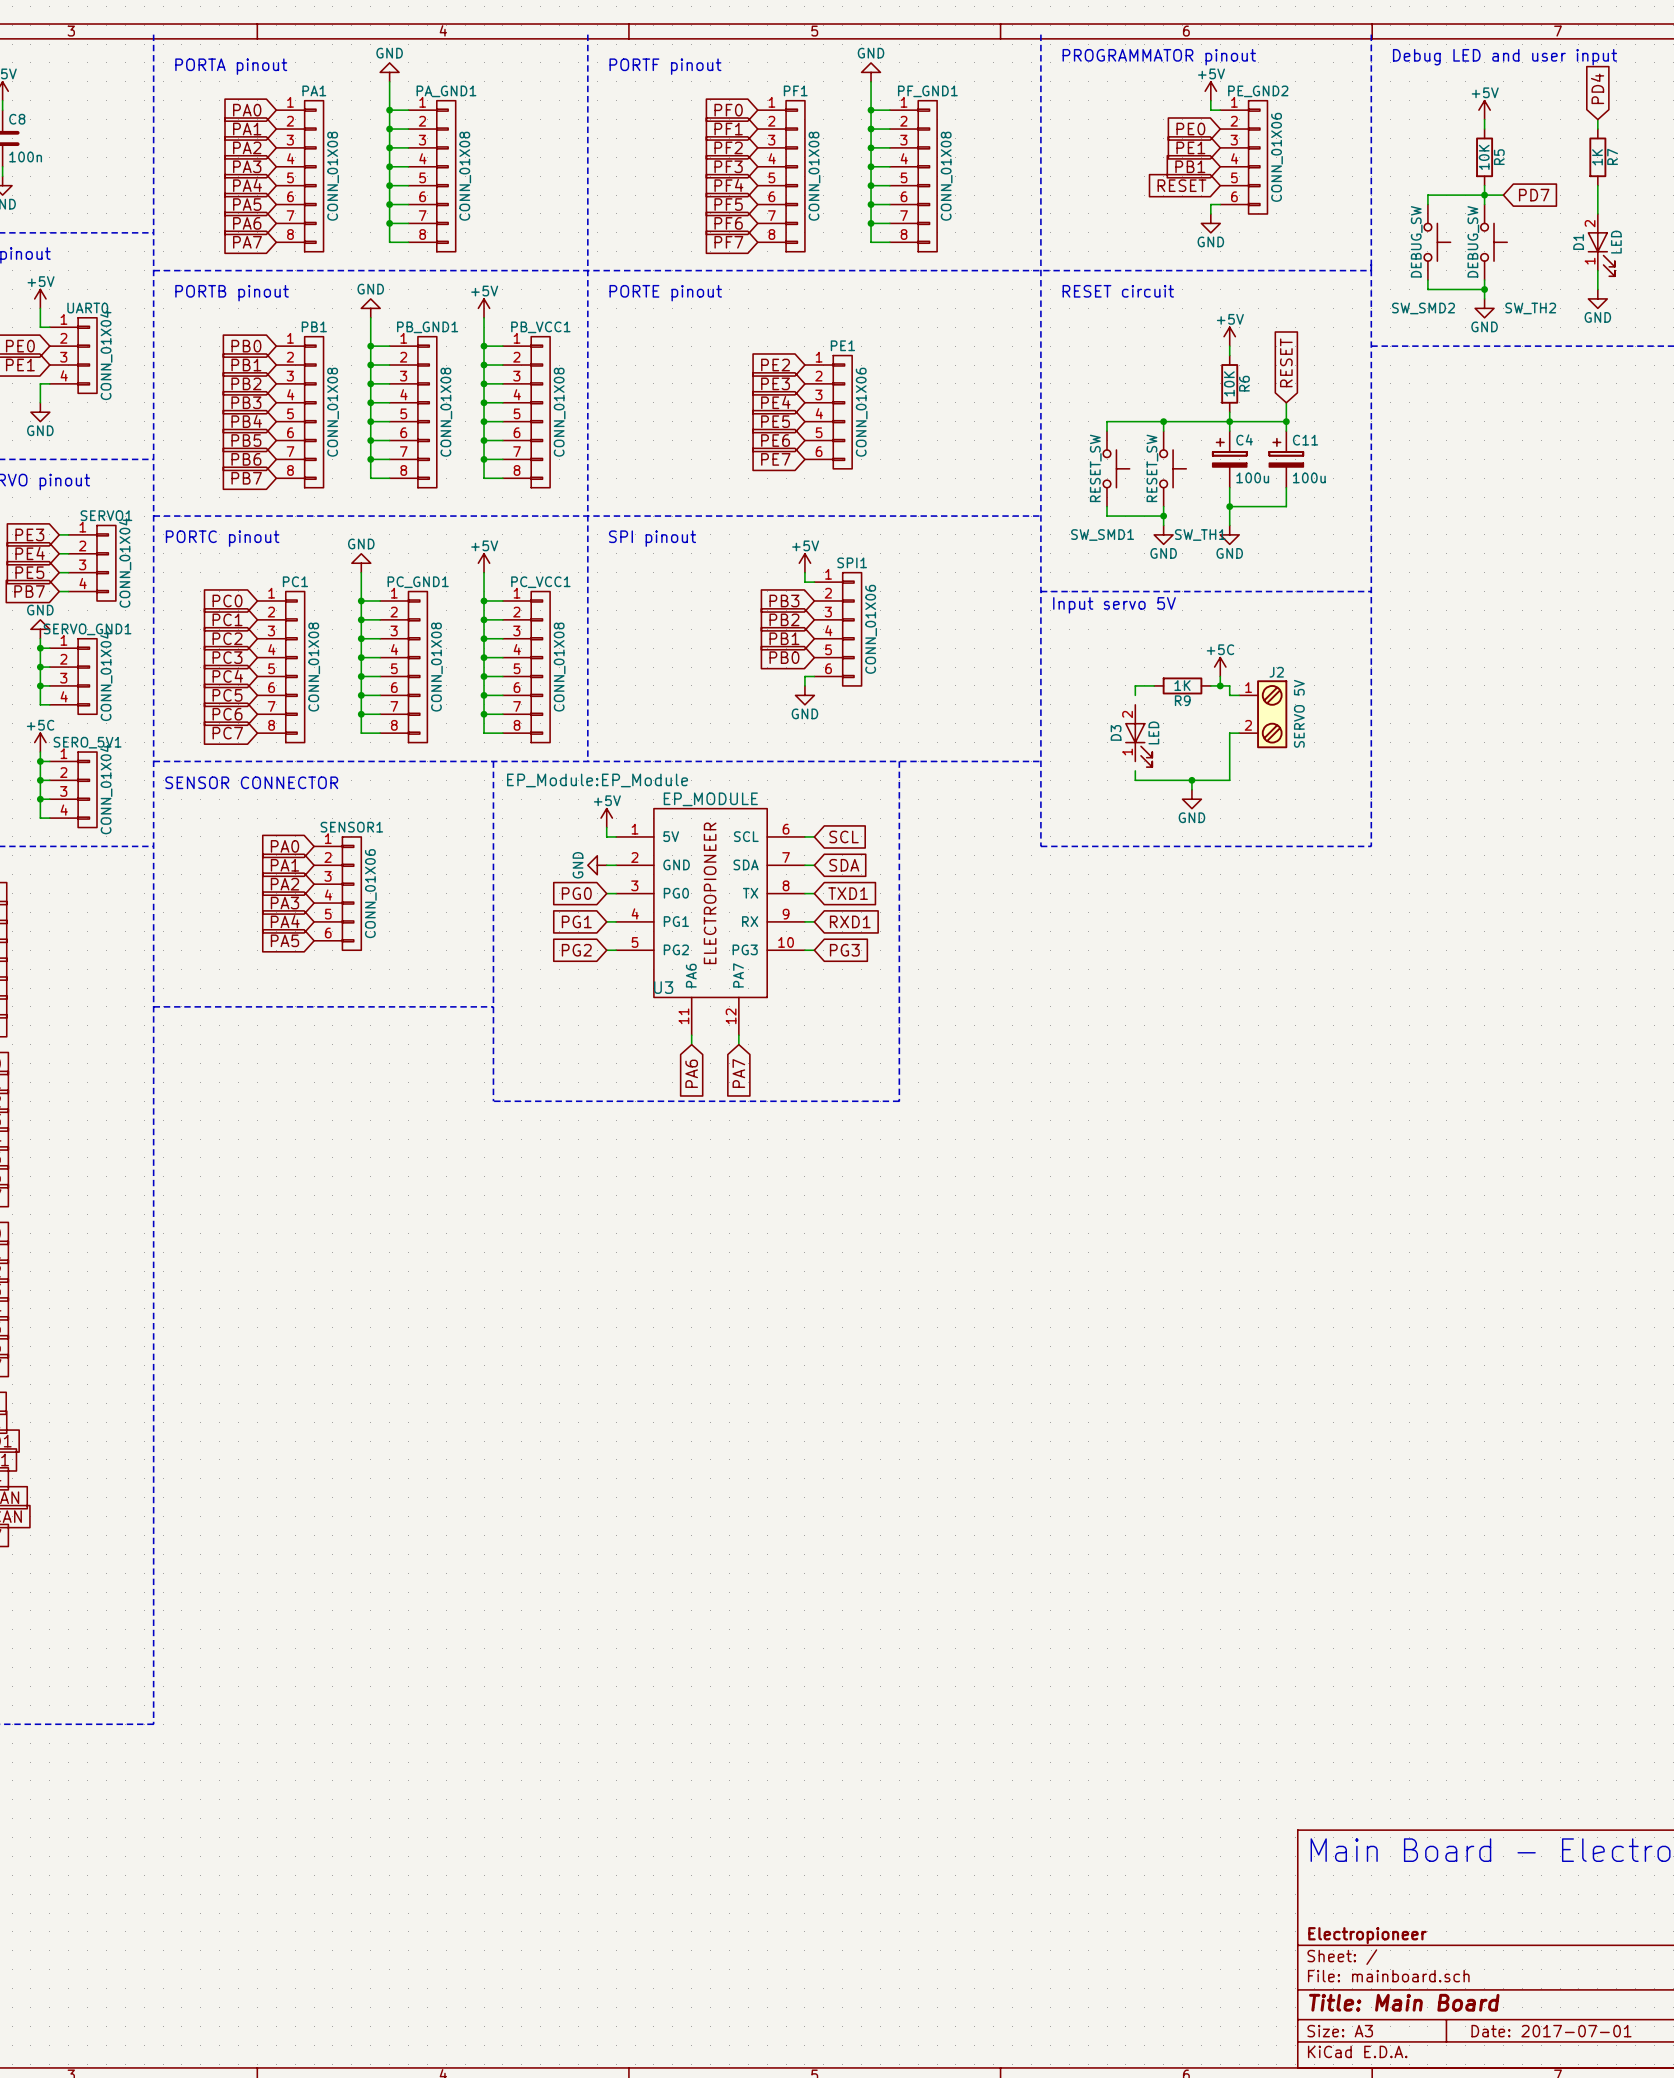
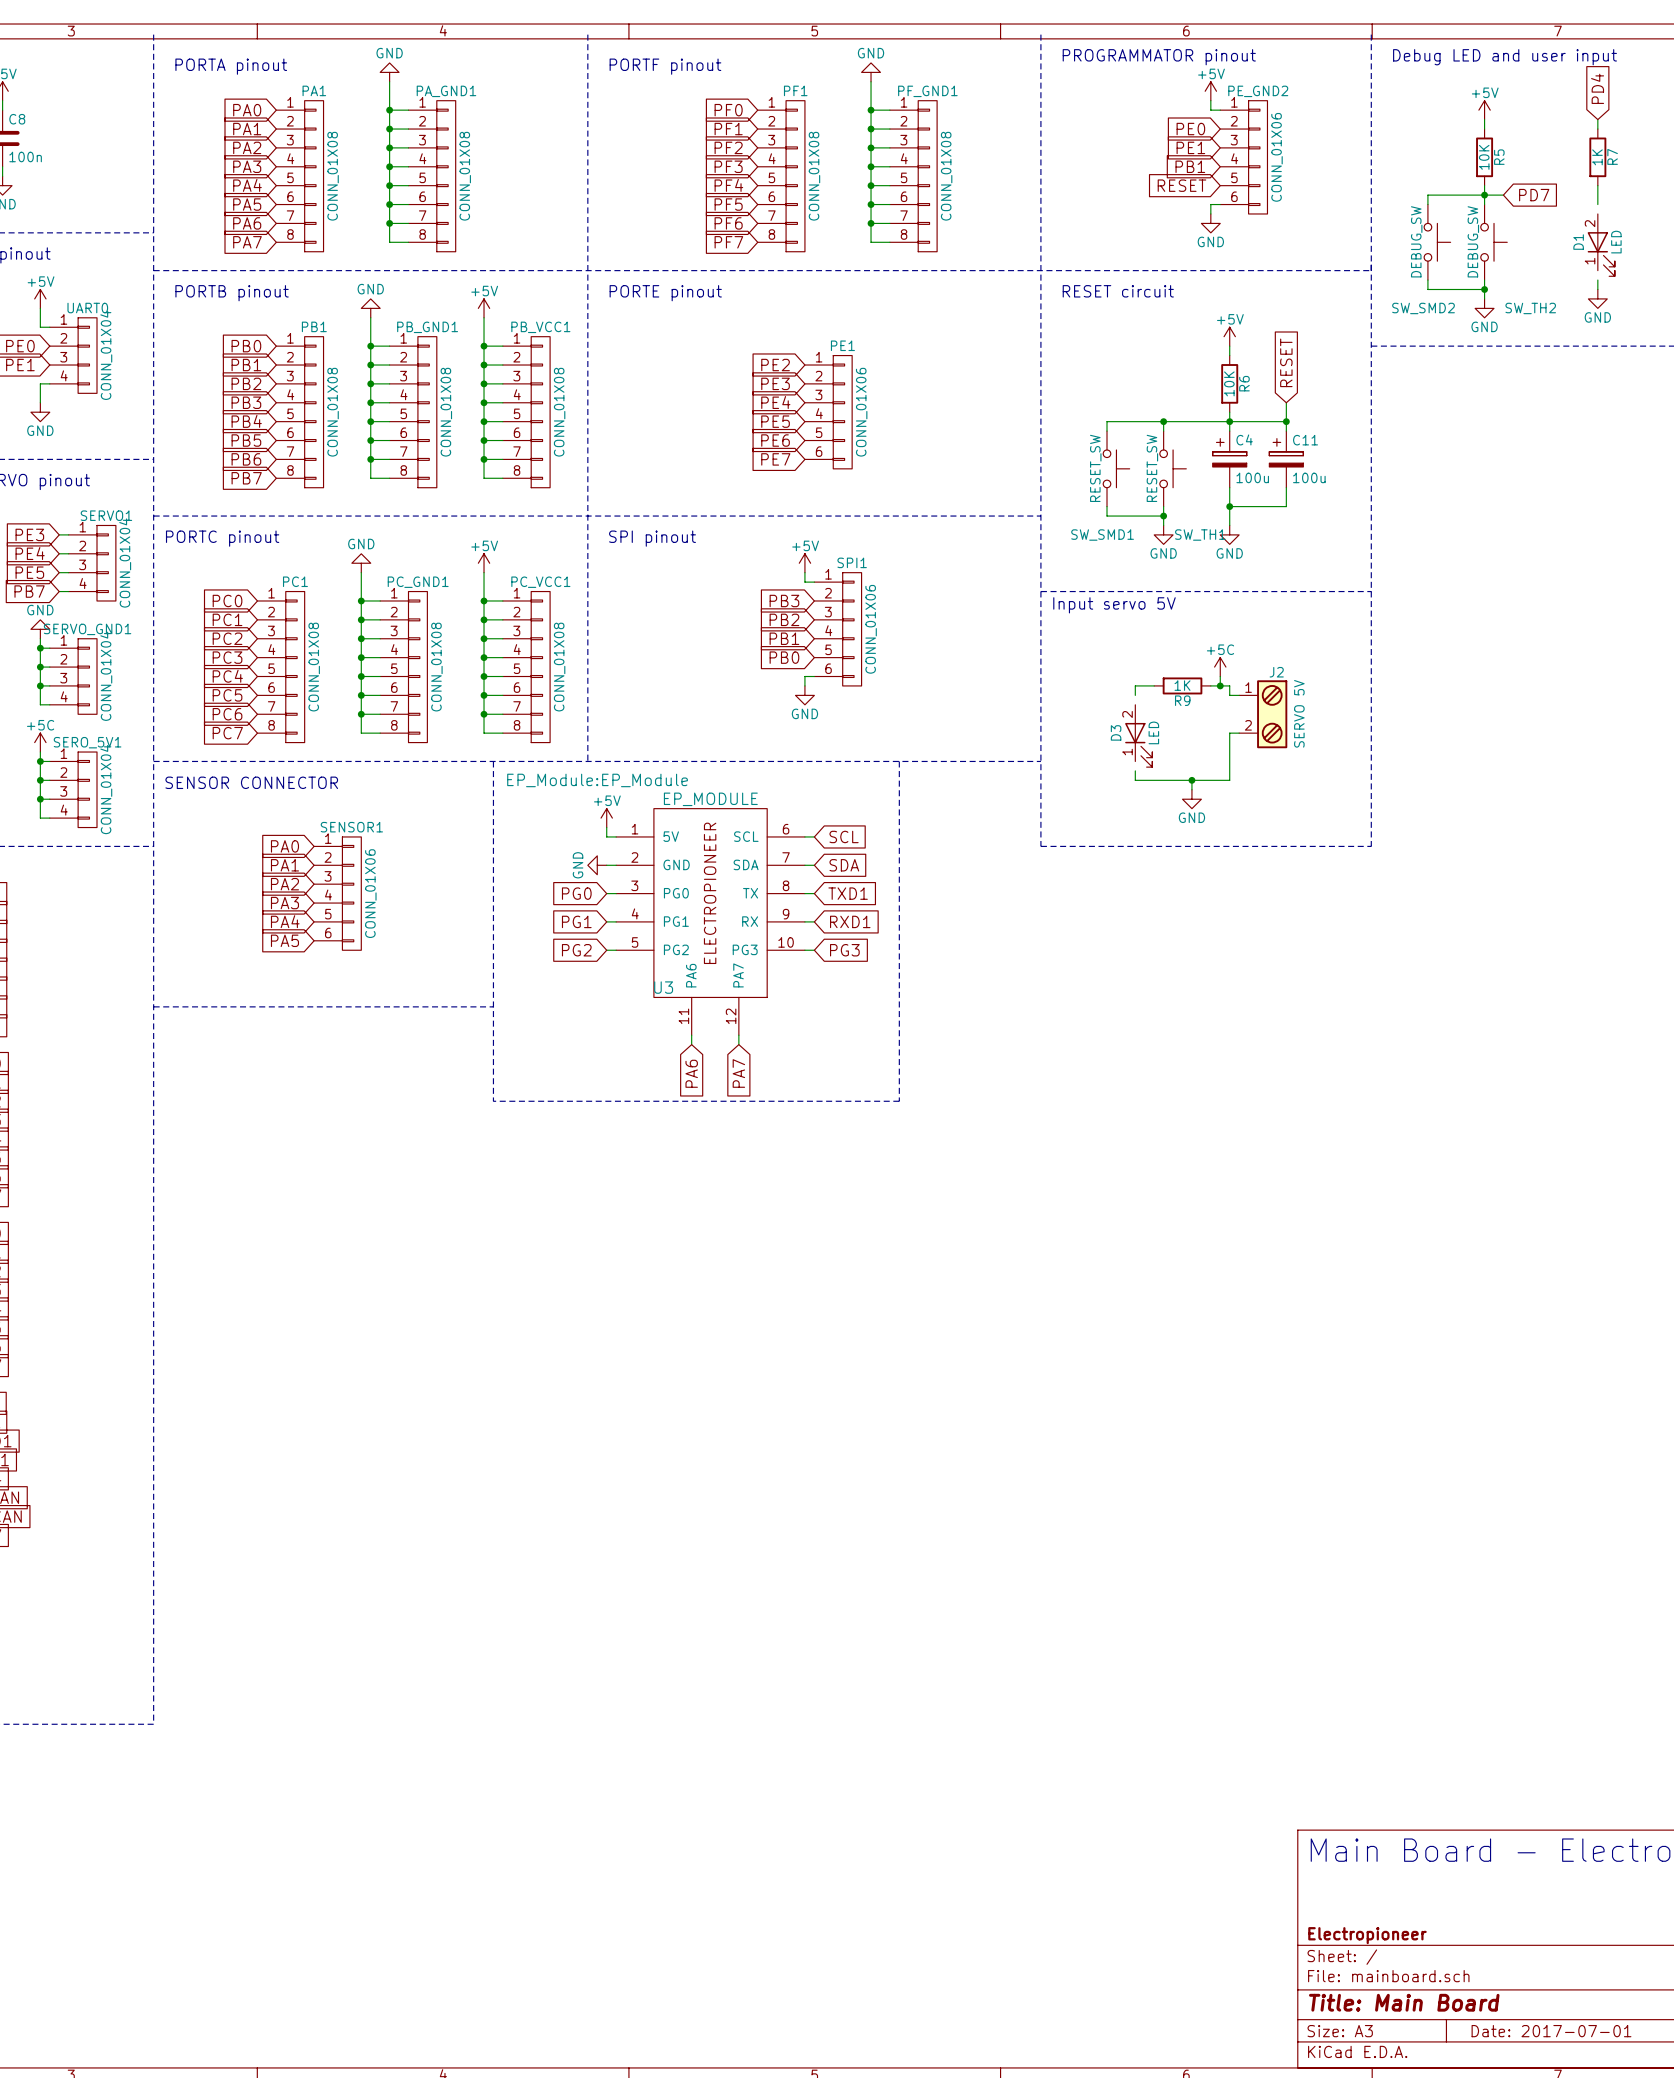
wire: (1597, 204) (1597, 213) -> none
wire: (1597, 270) (1597, 280) -> none

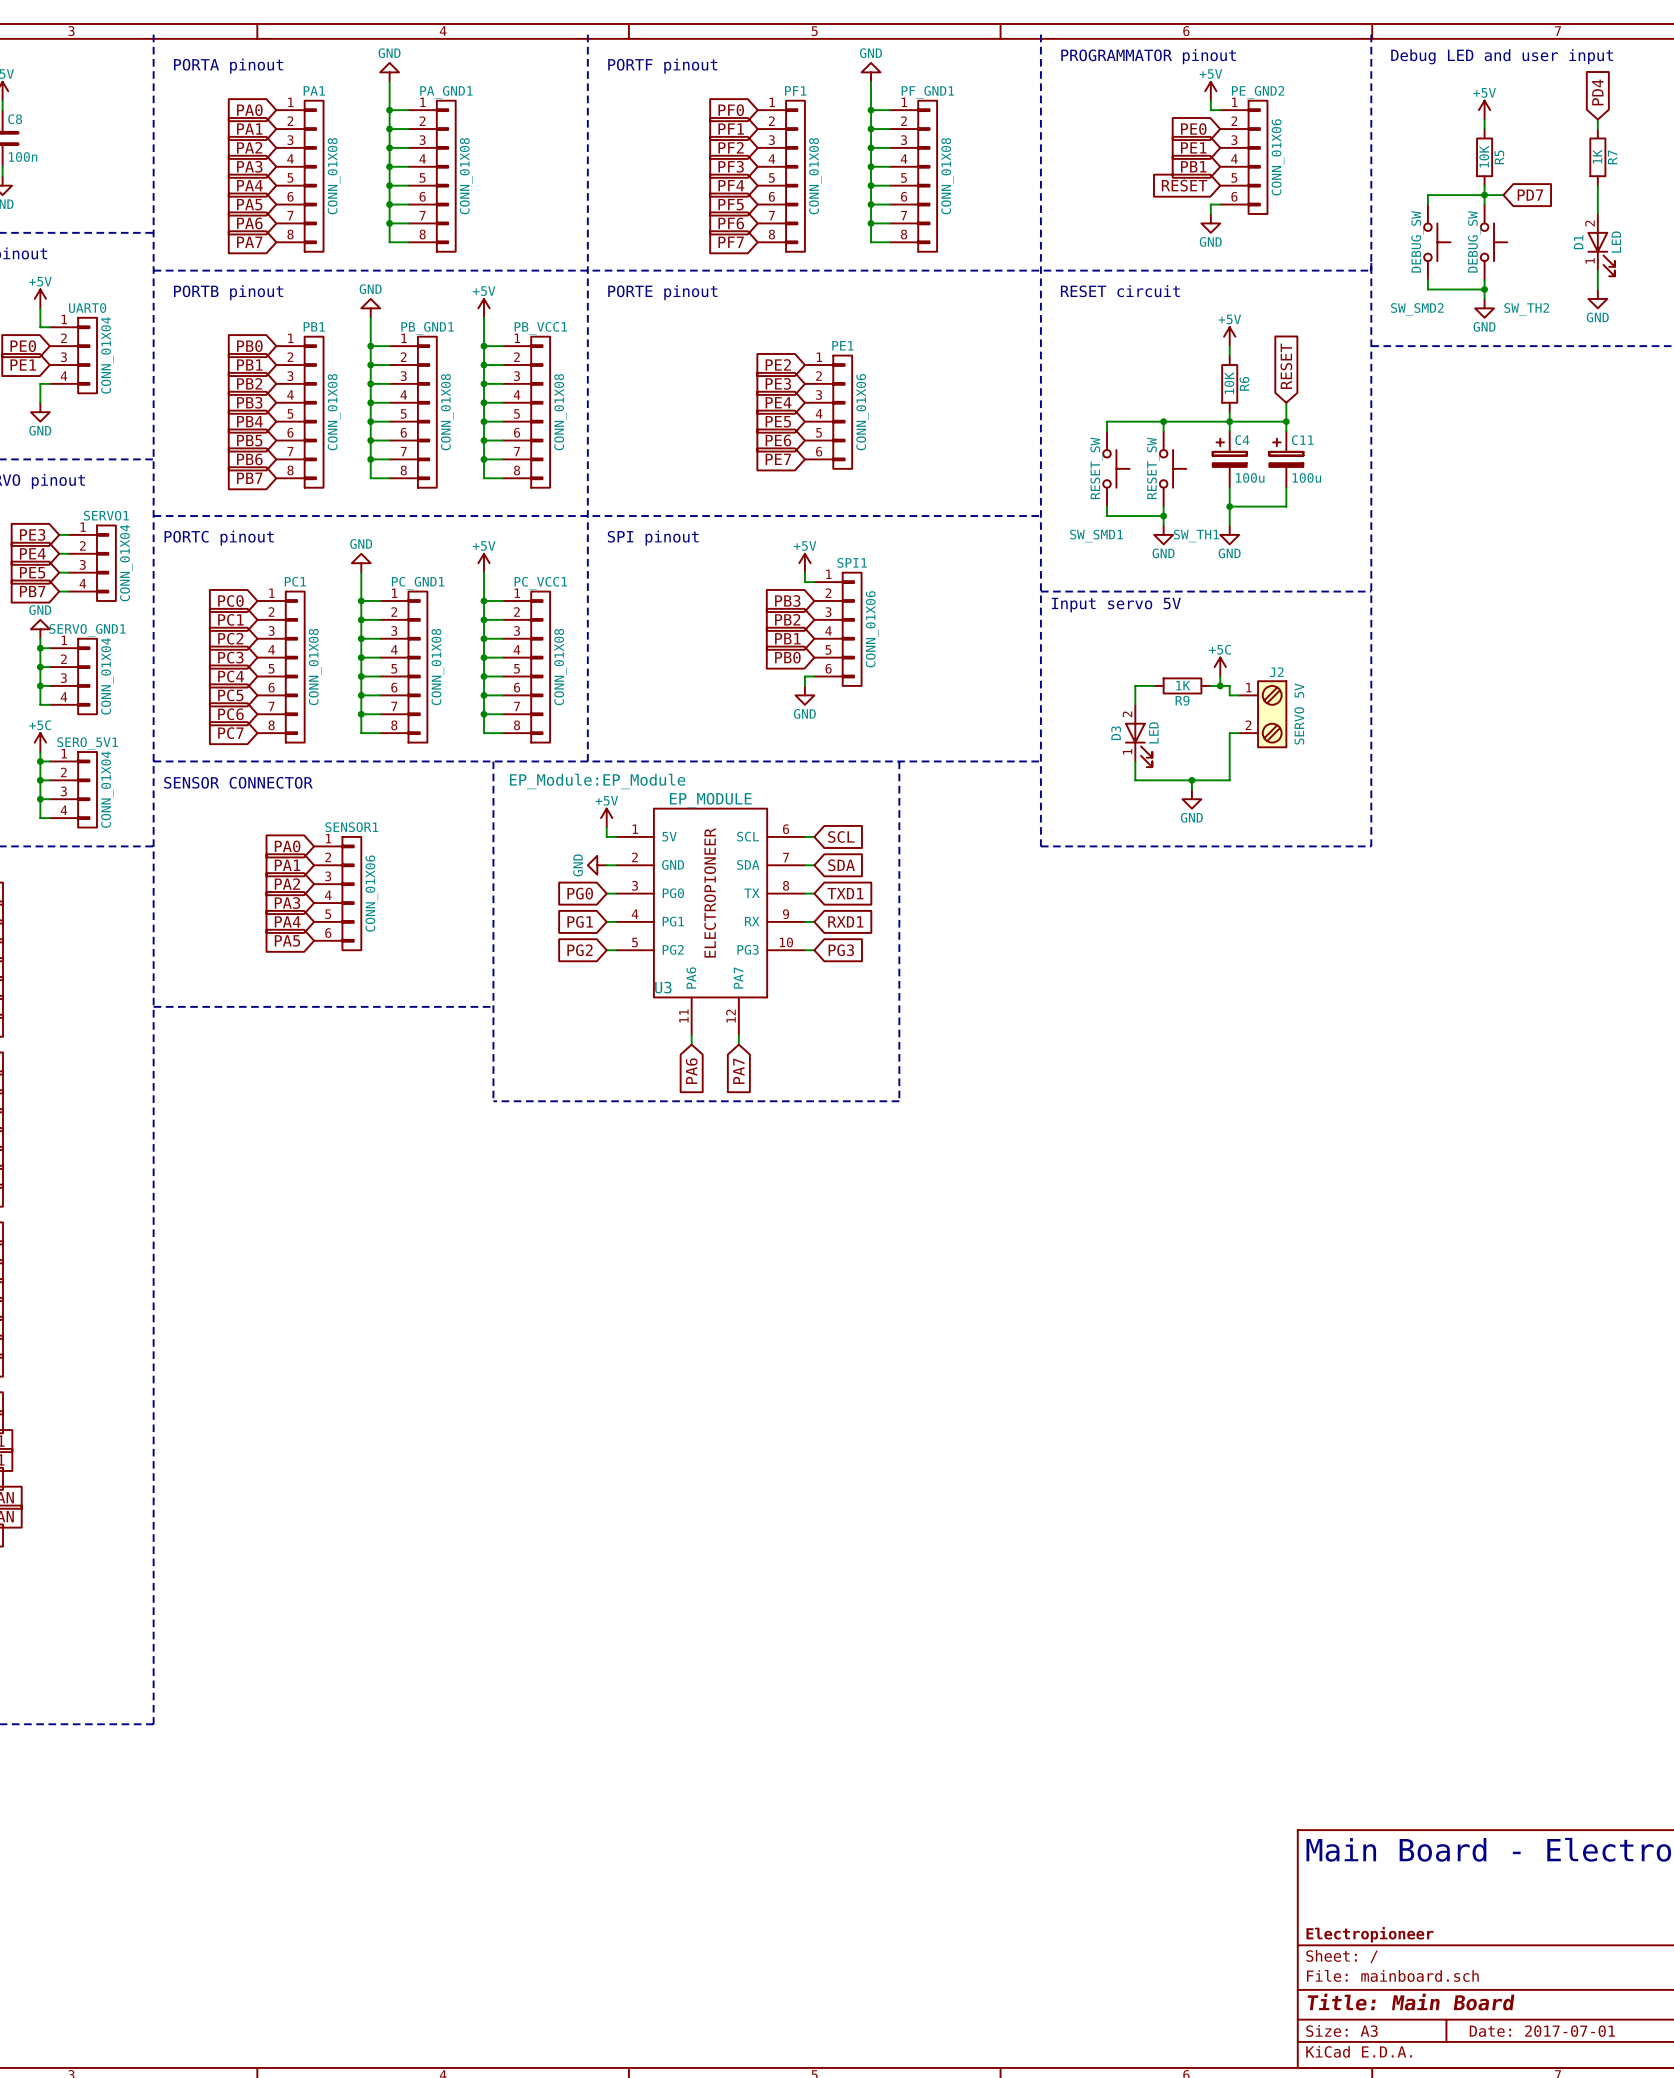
wire: none -> (1597, 204) (1597, 213)
wire: none -> (1597, 270) (1597, 280)
wire: none -> (1135, 695) (1135, 704)
wire: none -> (1135, 761) (1135, 770)

